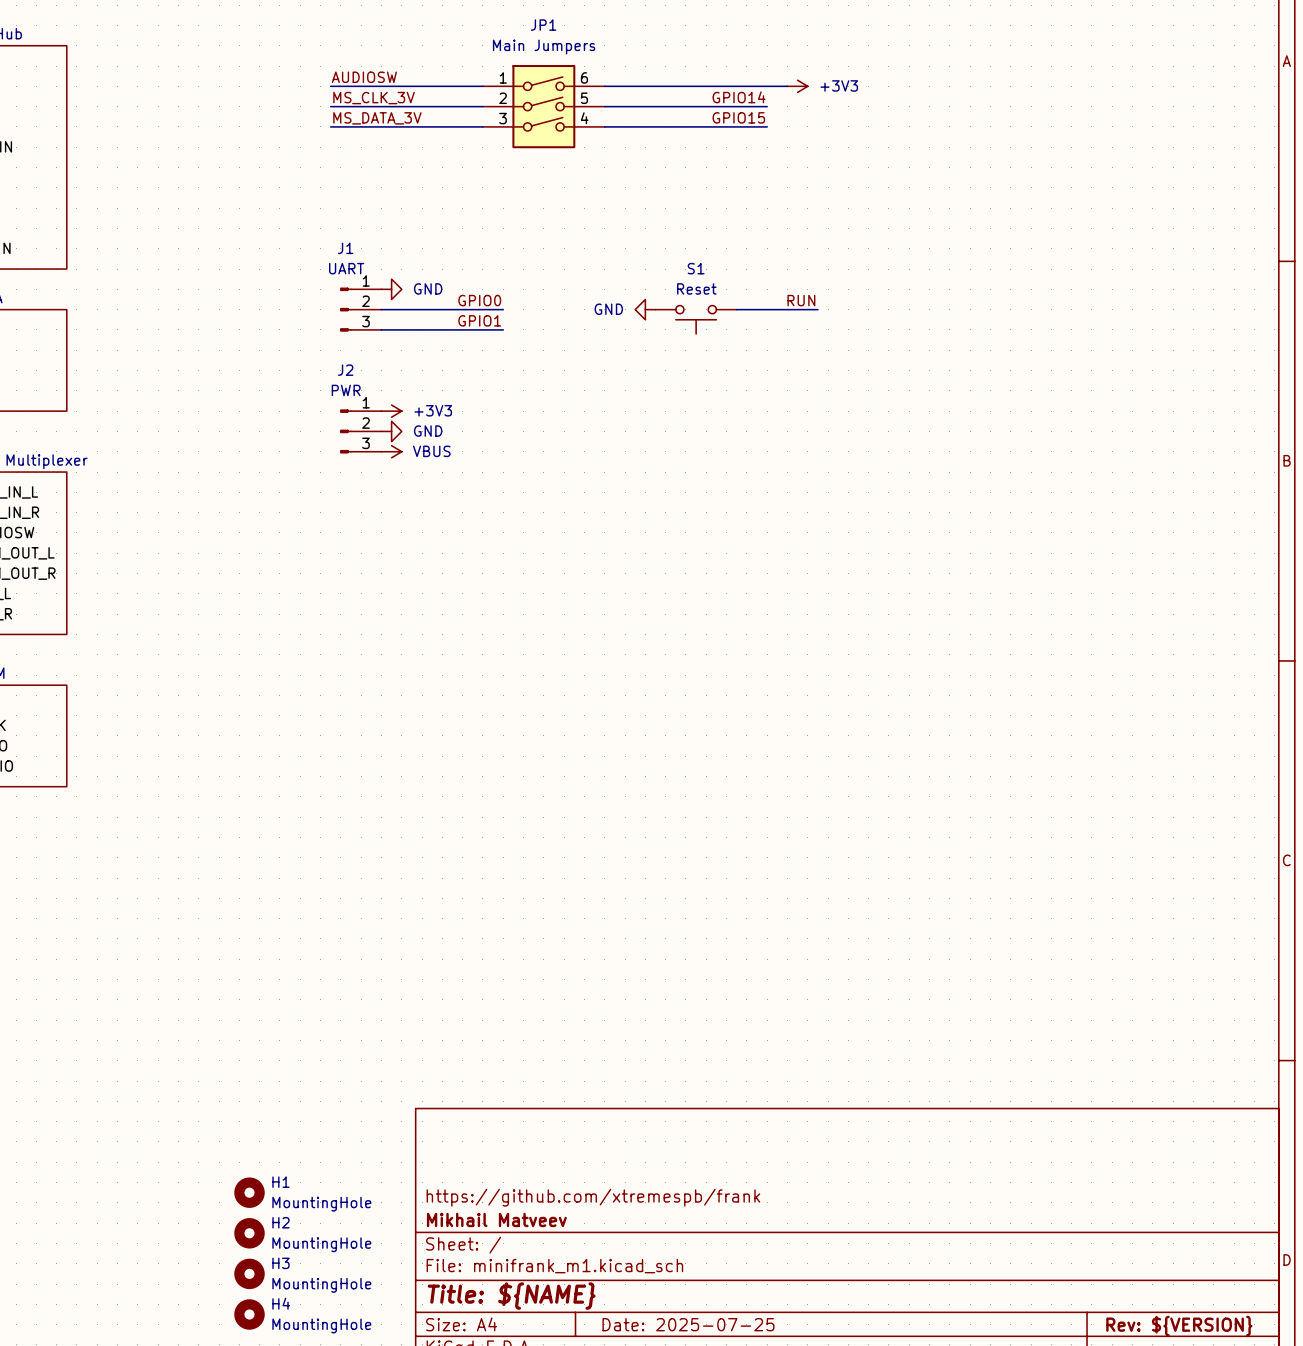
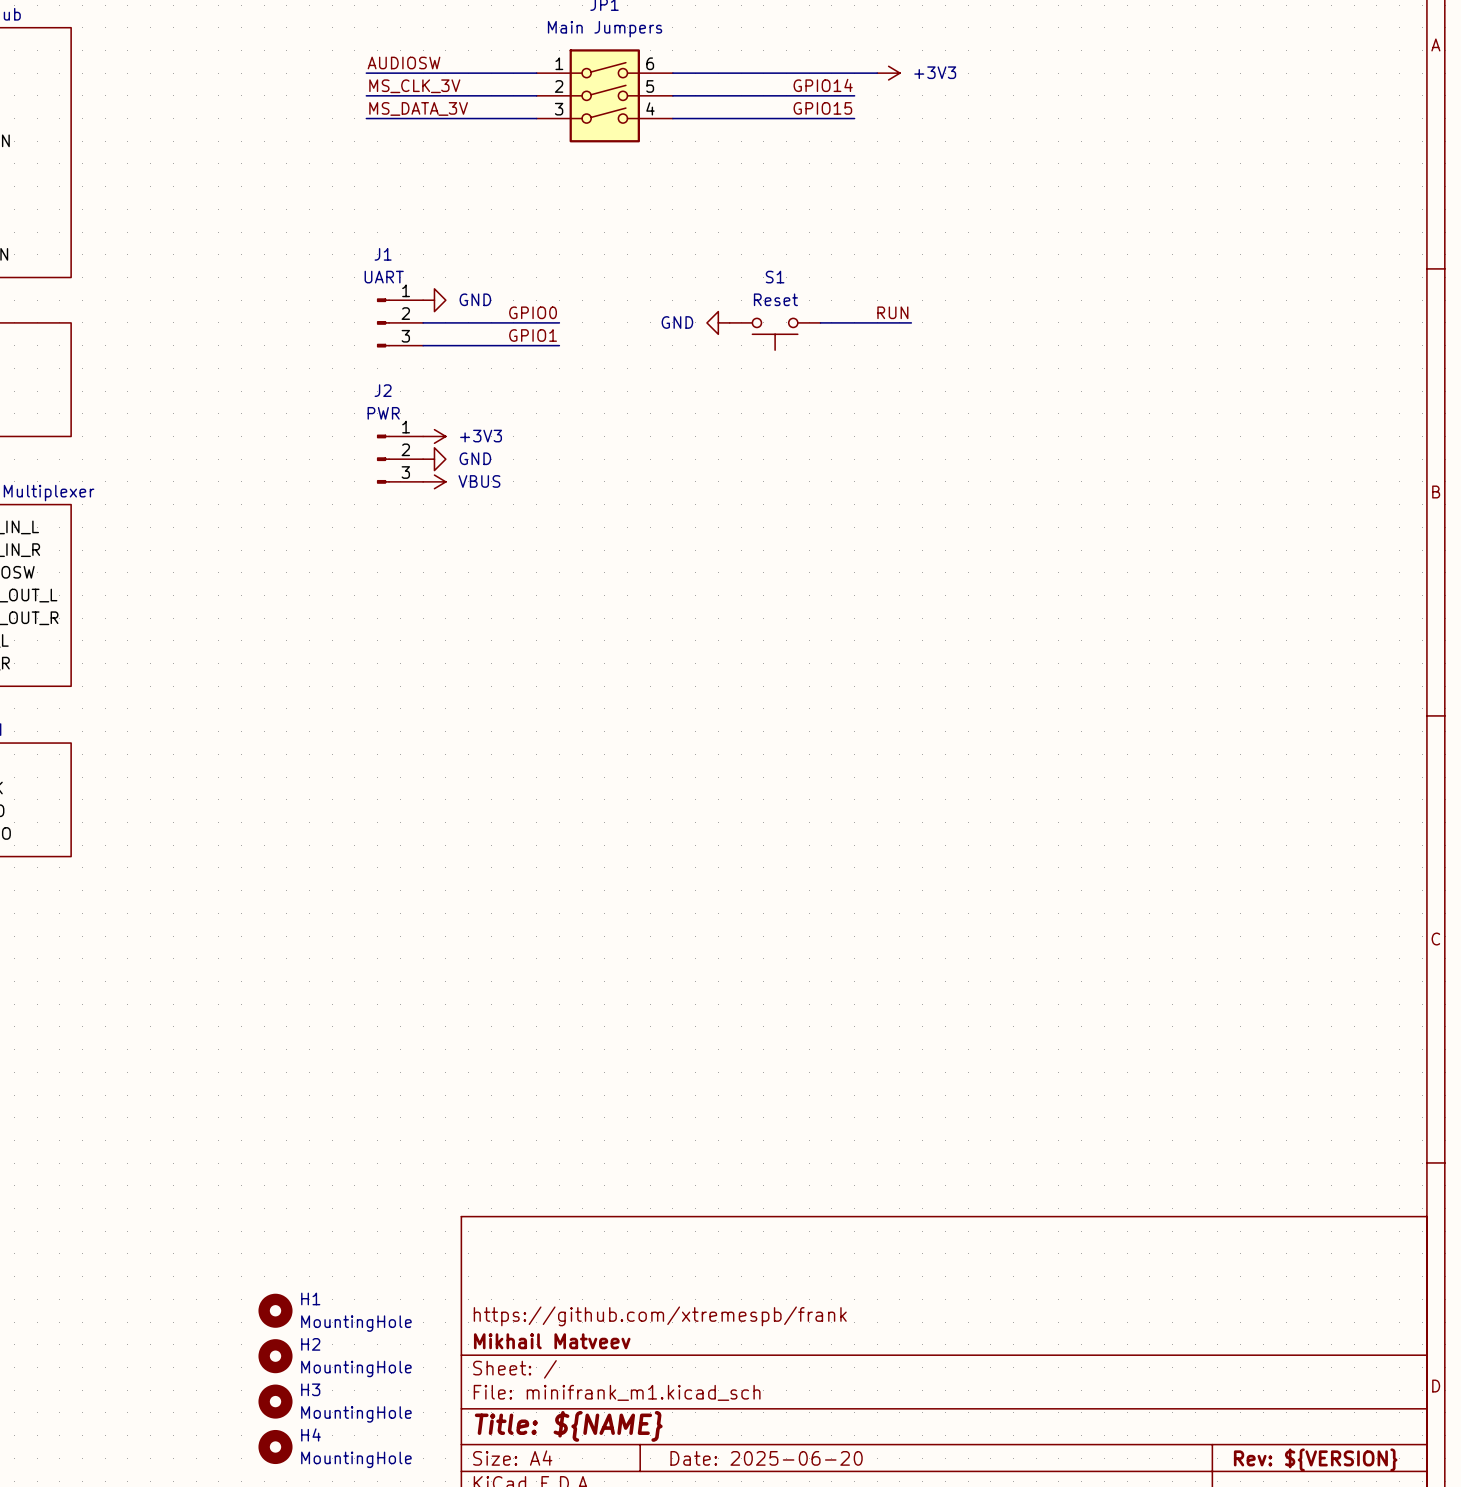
title block: Date: 2025-07-25 (688, 1324) -> Date: 2025-06-20 (766, 1458)

